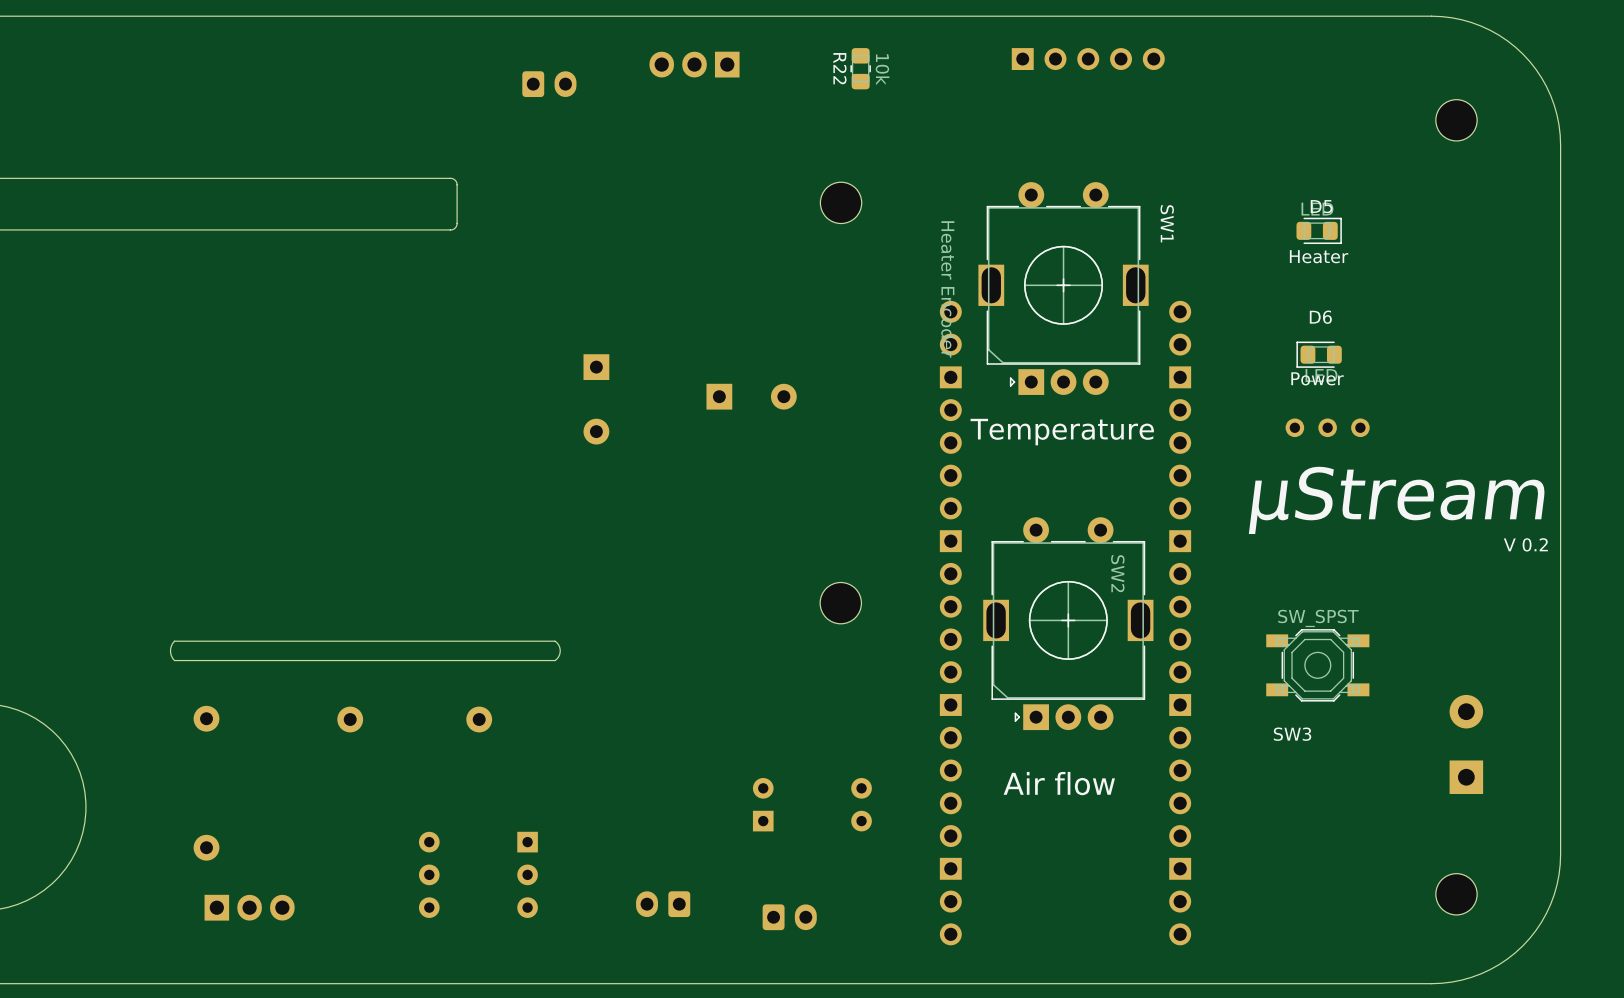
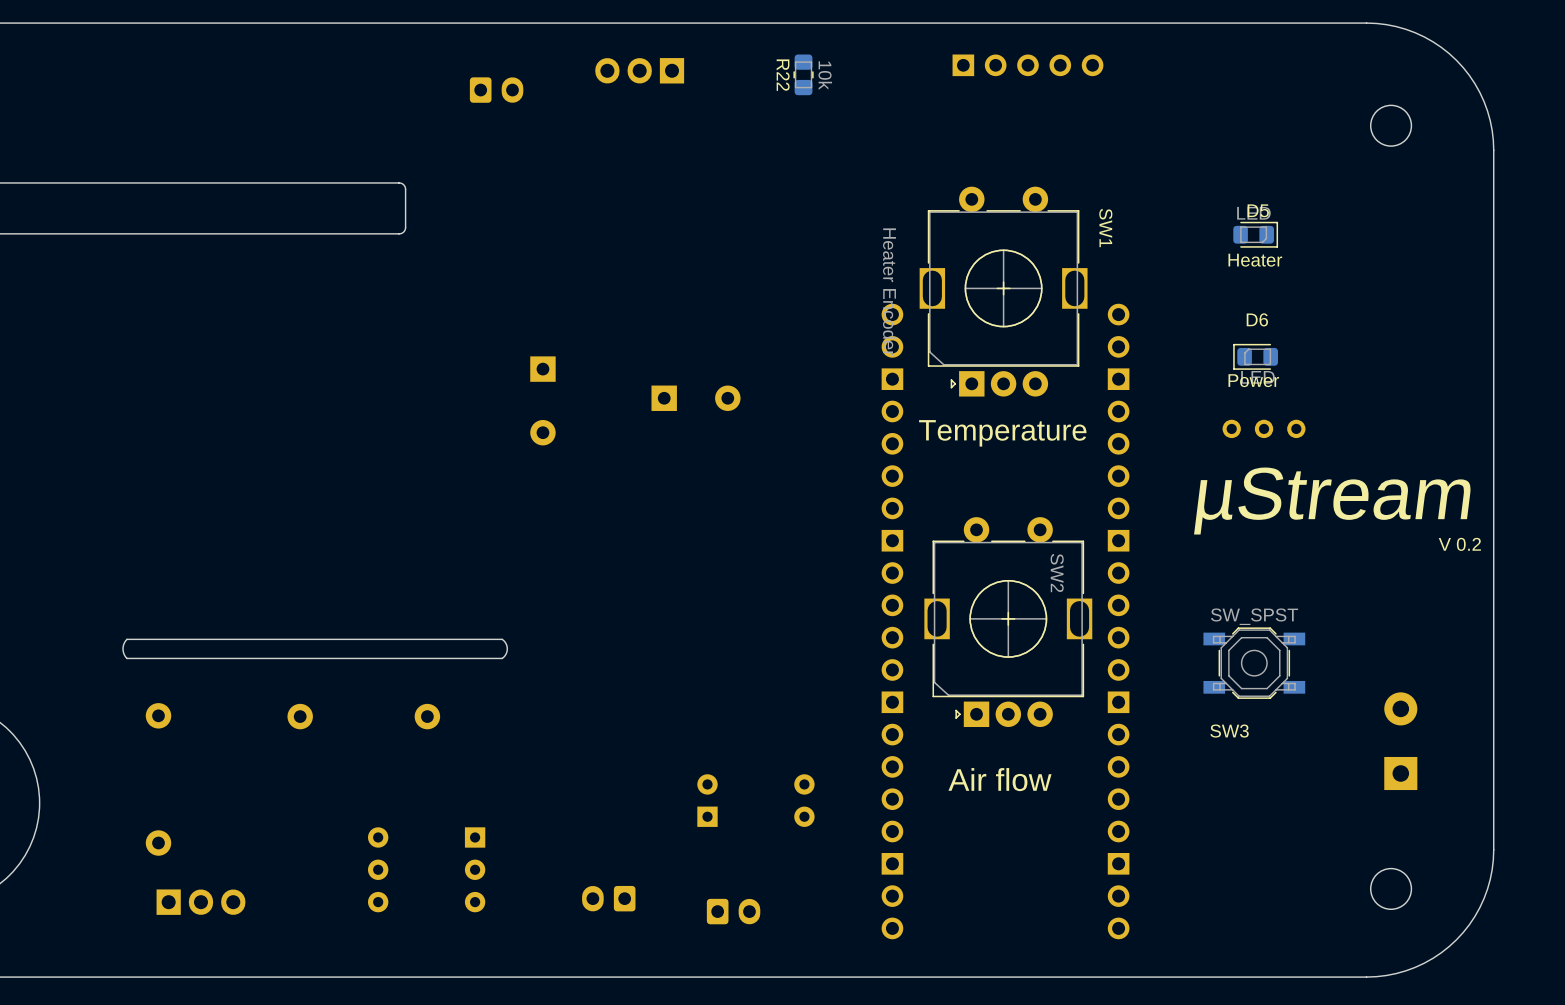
part: (841, 202) -> none
part: (840, 603) -> none

